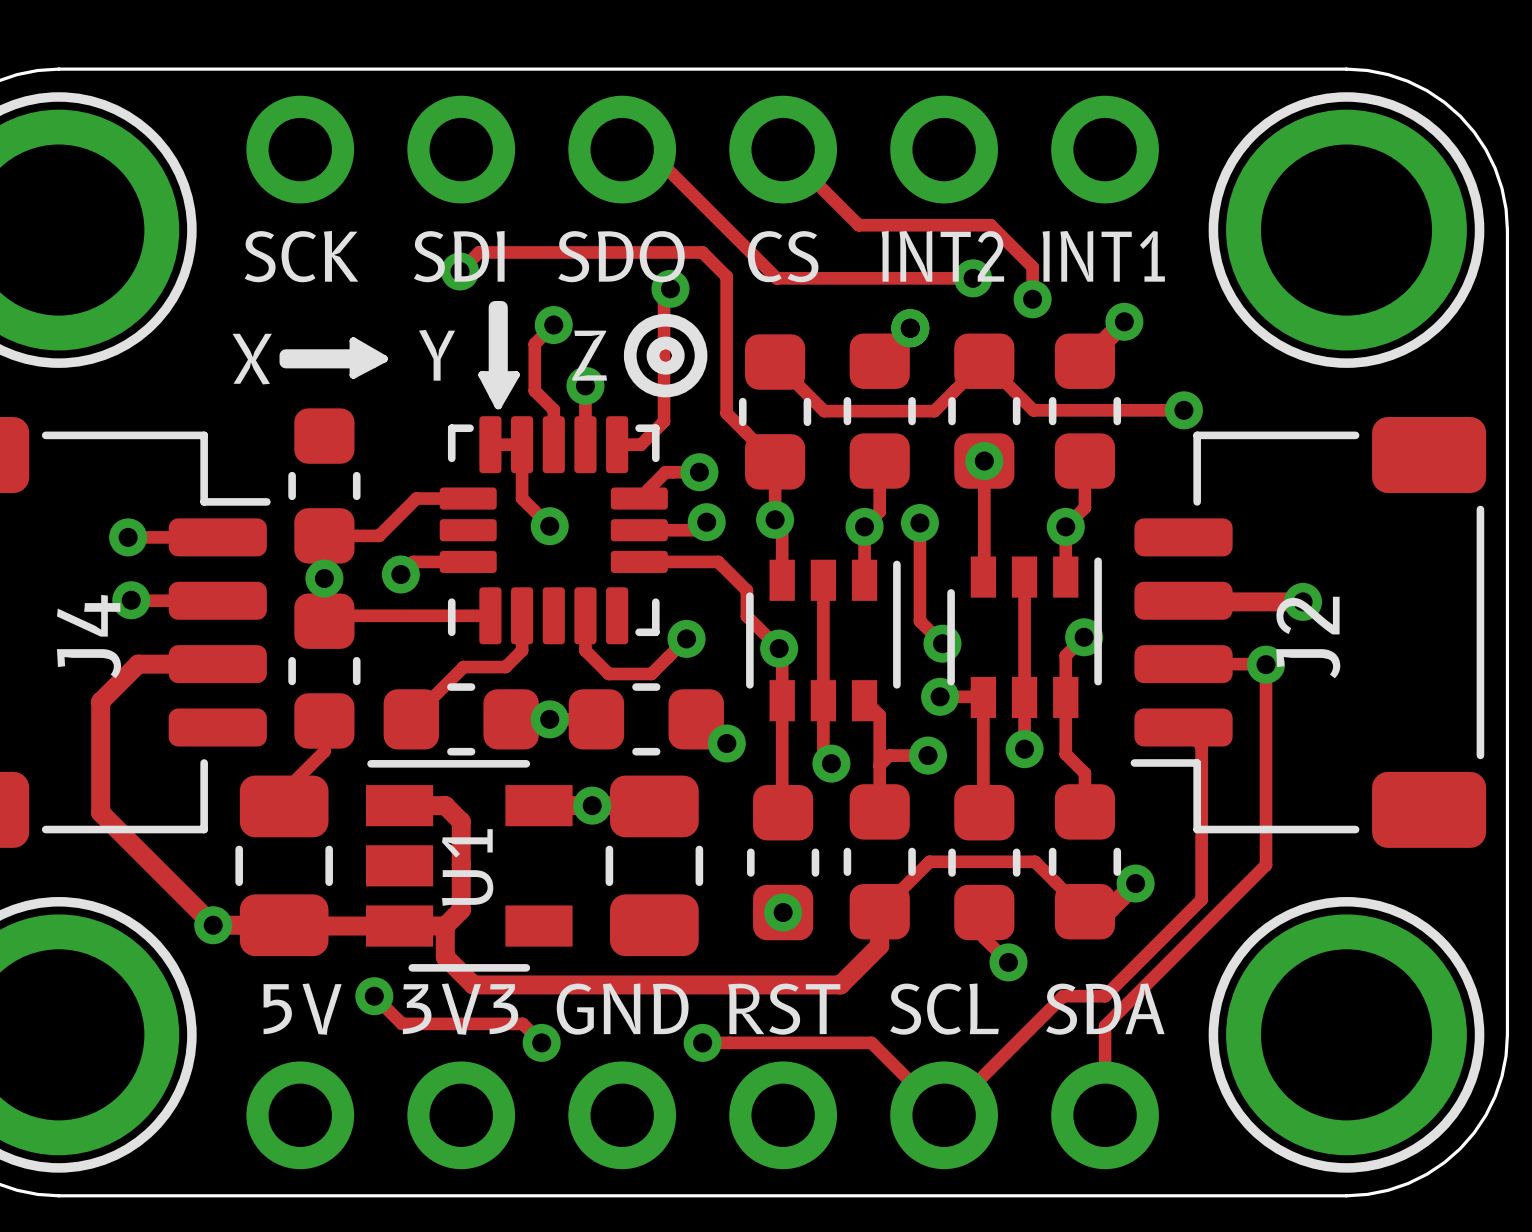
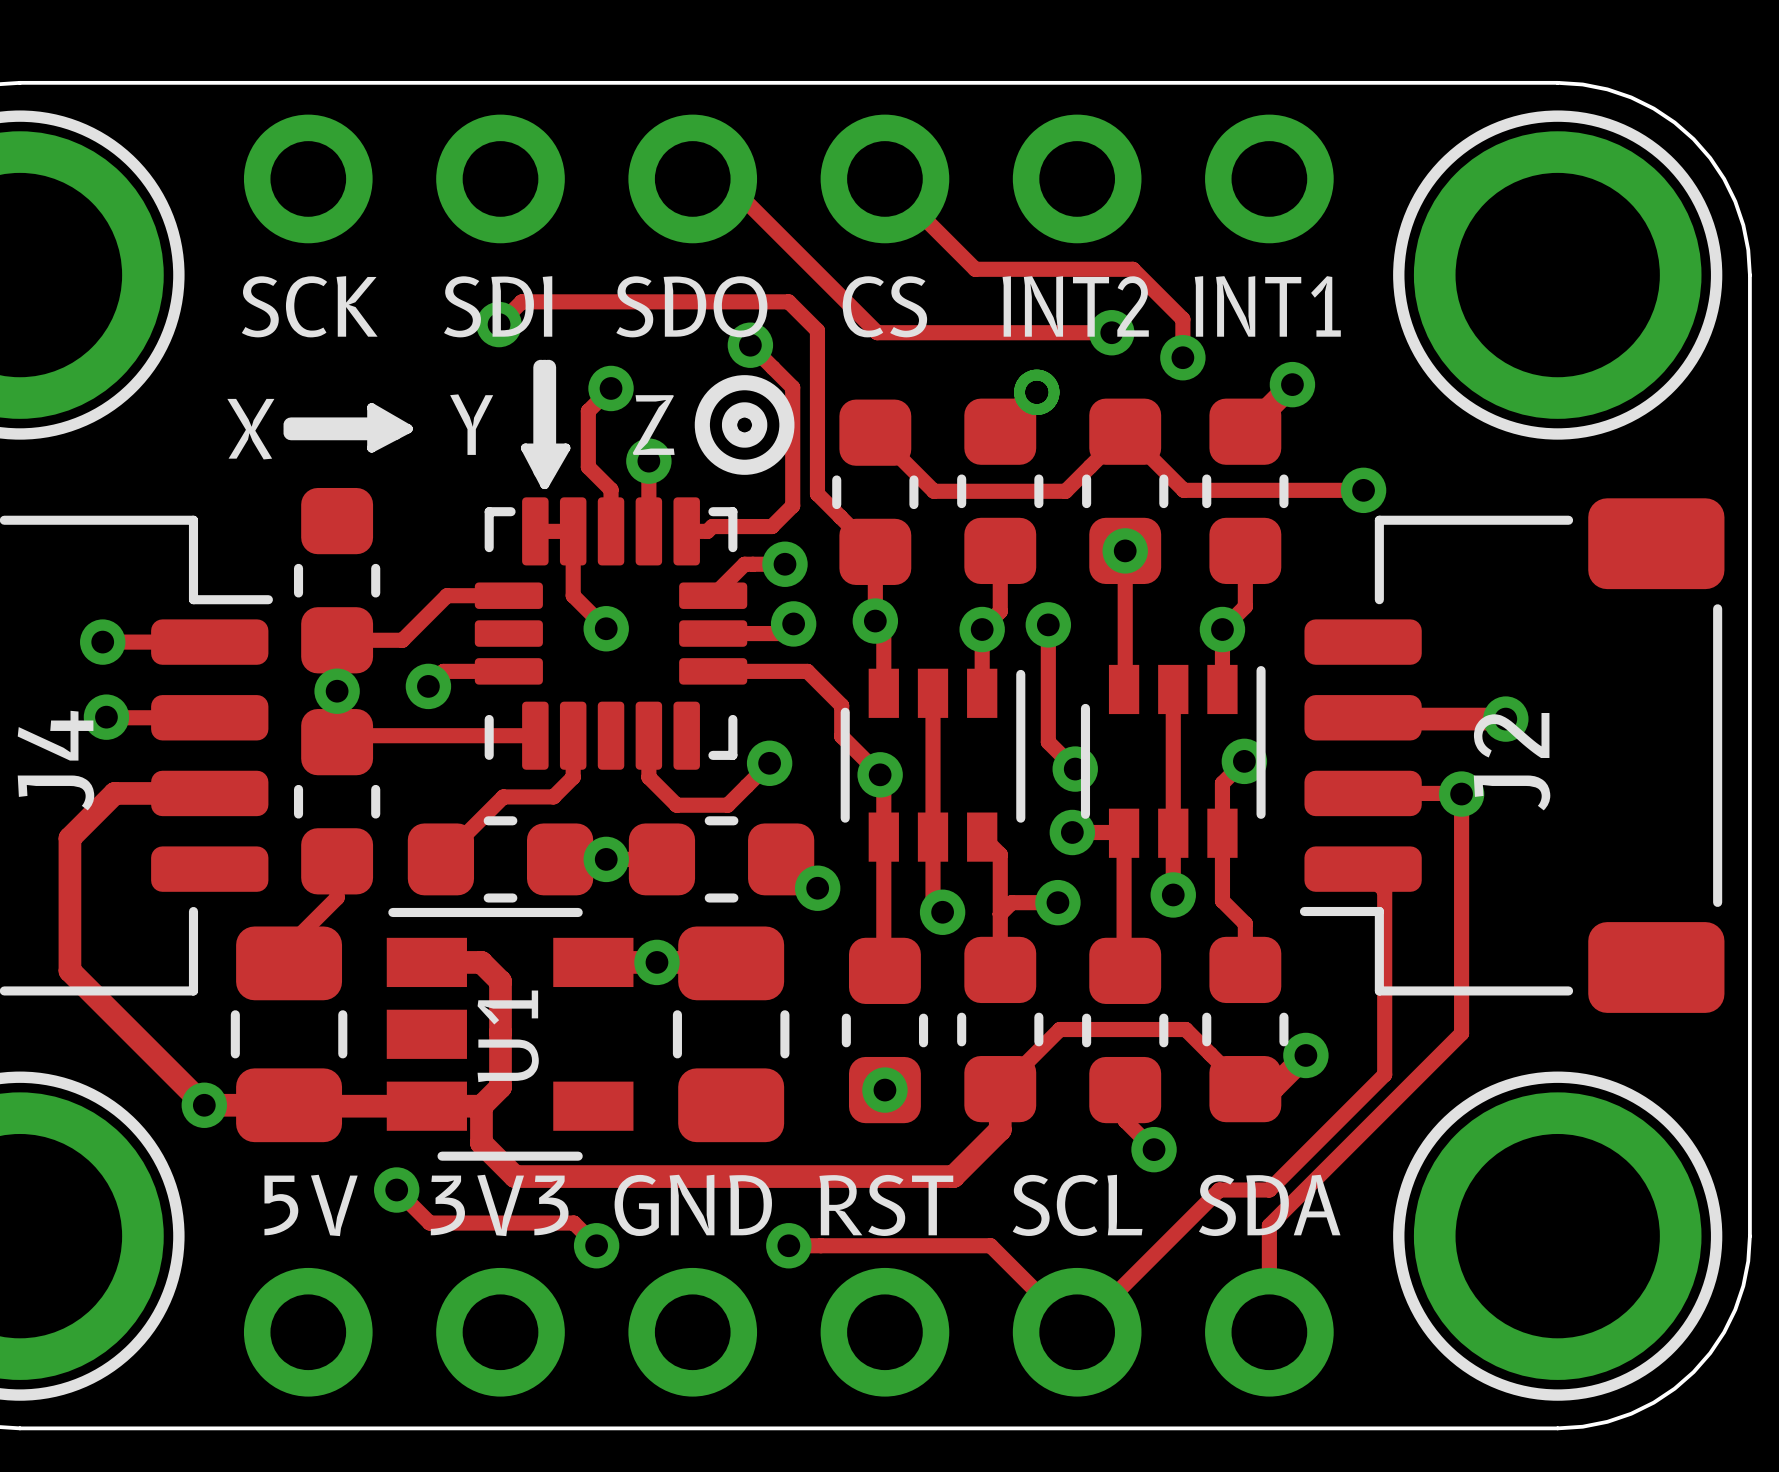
track: (670, 288) (664, 295) (664, 421) (640, 444) (634, 444) -> (750, 345) (792, 387) (792, 505) (771, 526) (712, 526) (707, 531)

